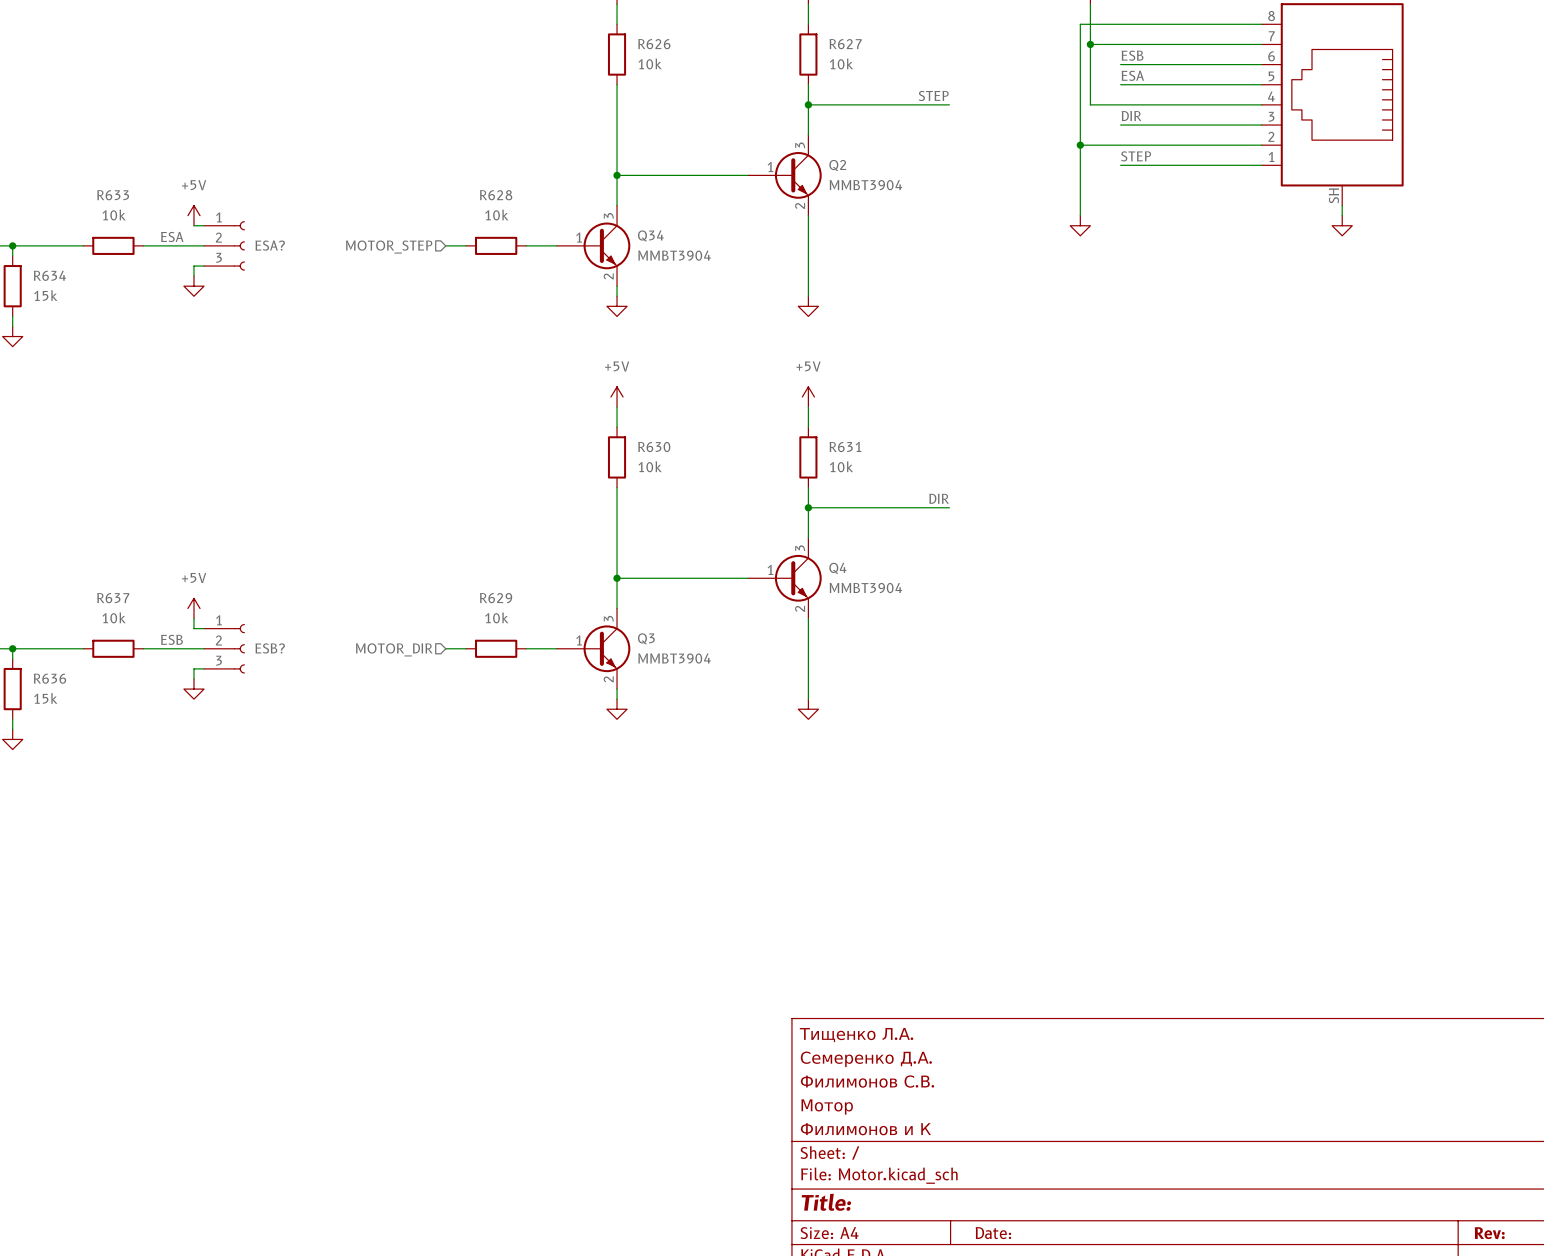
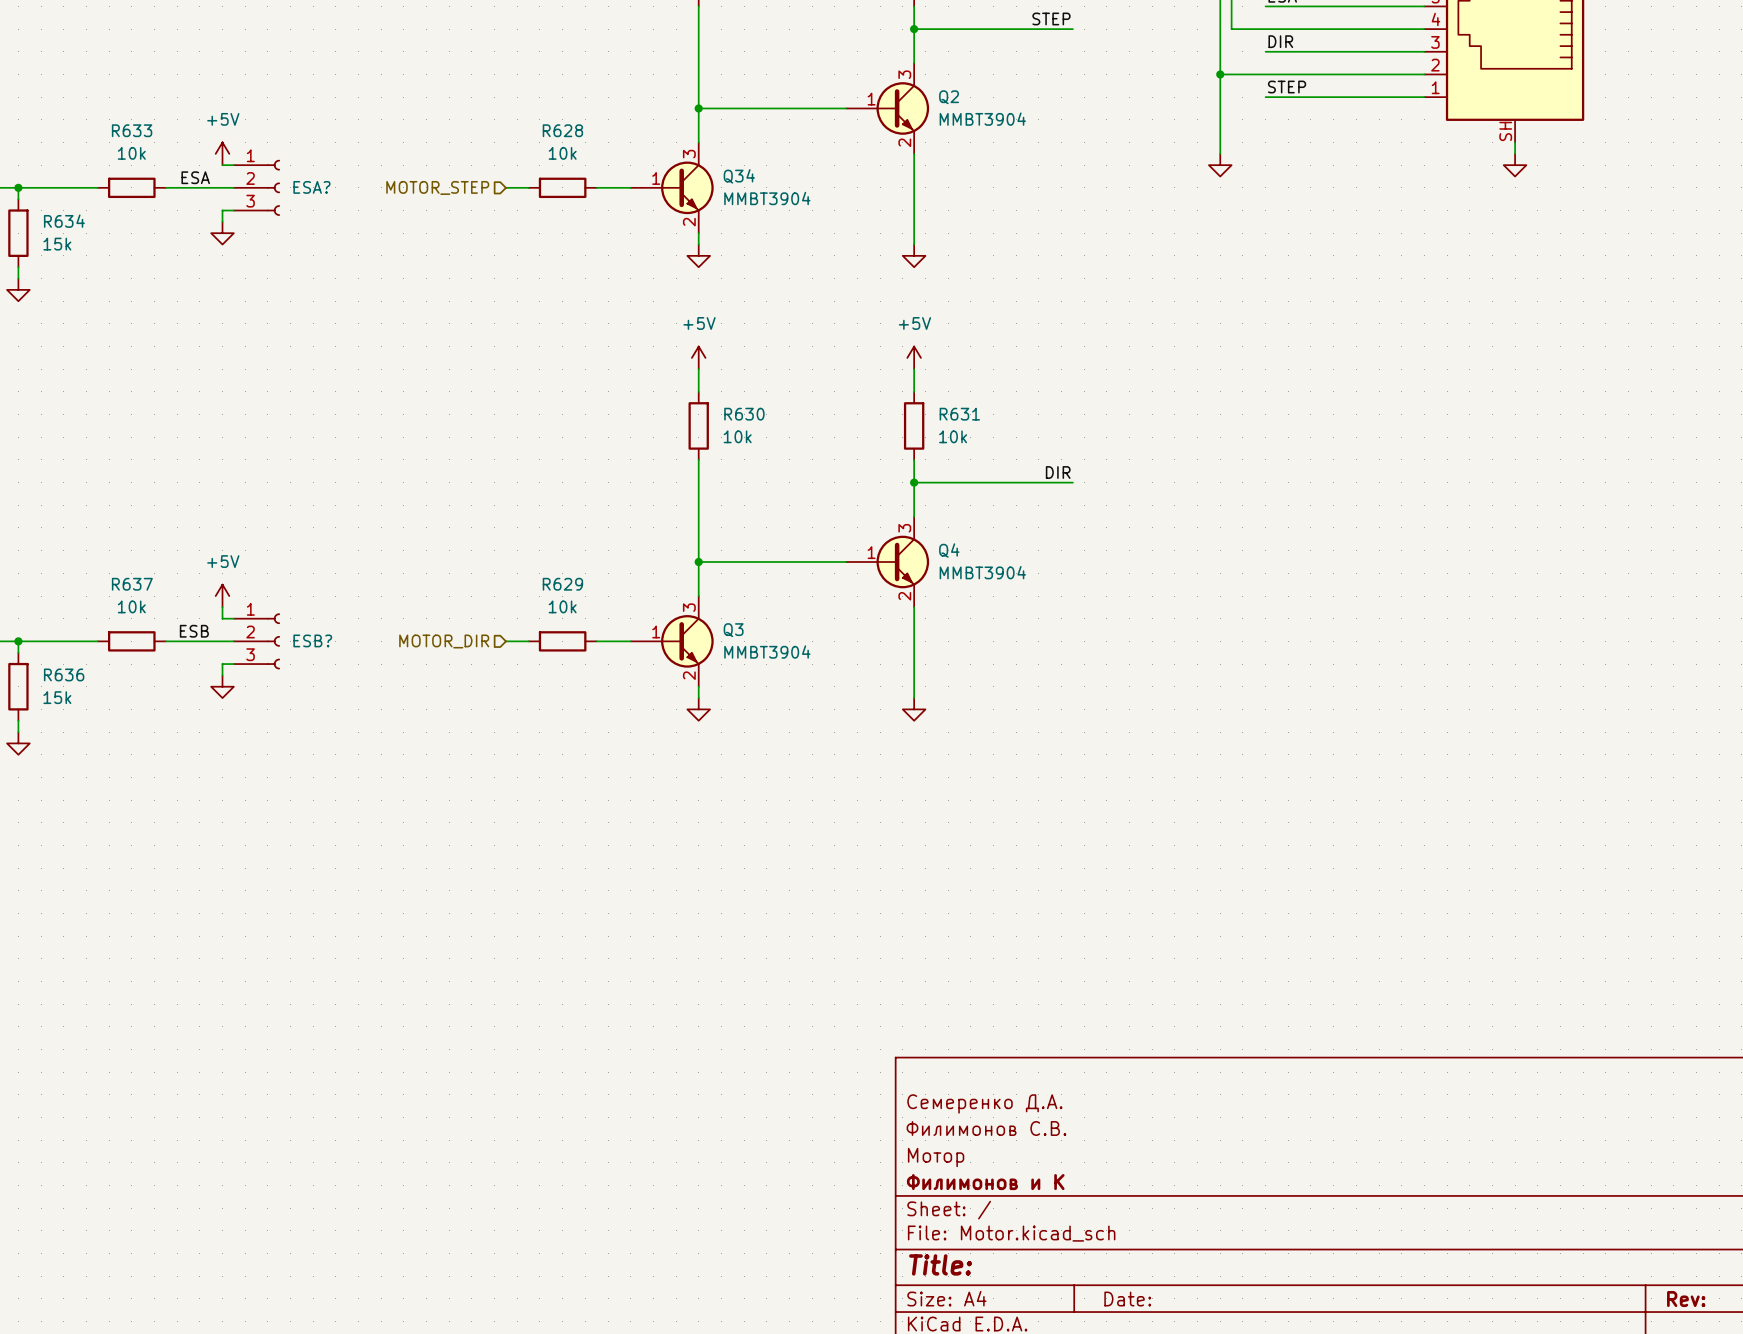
title block: Тищенко Л.А. (856, 1035) -> none

